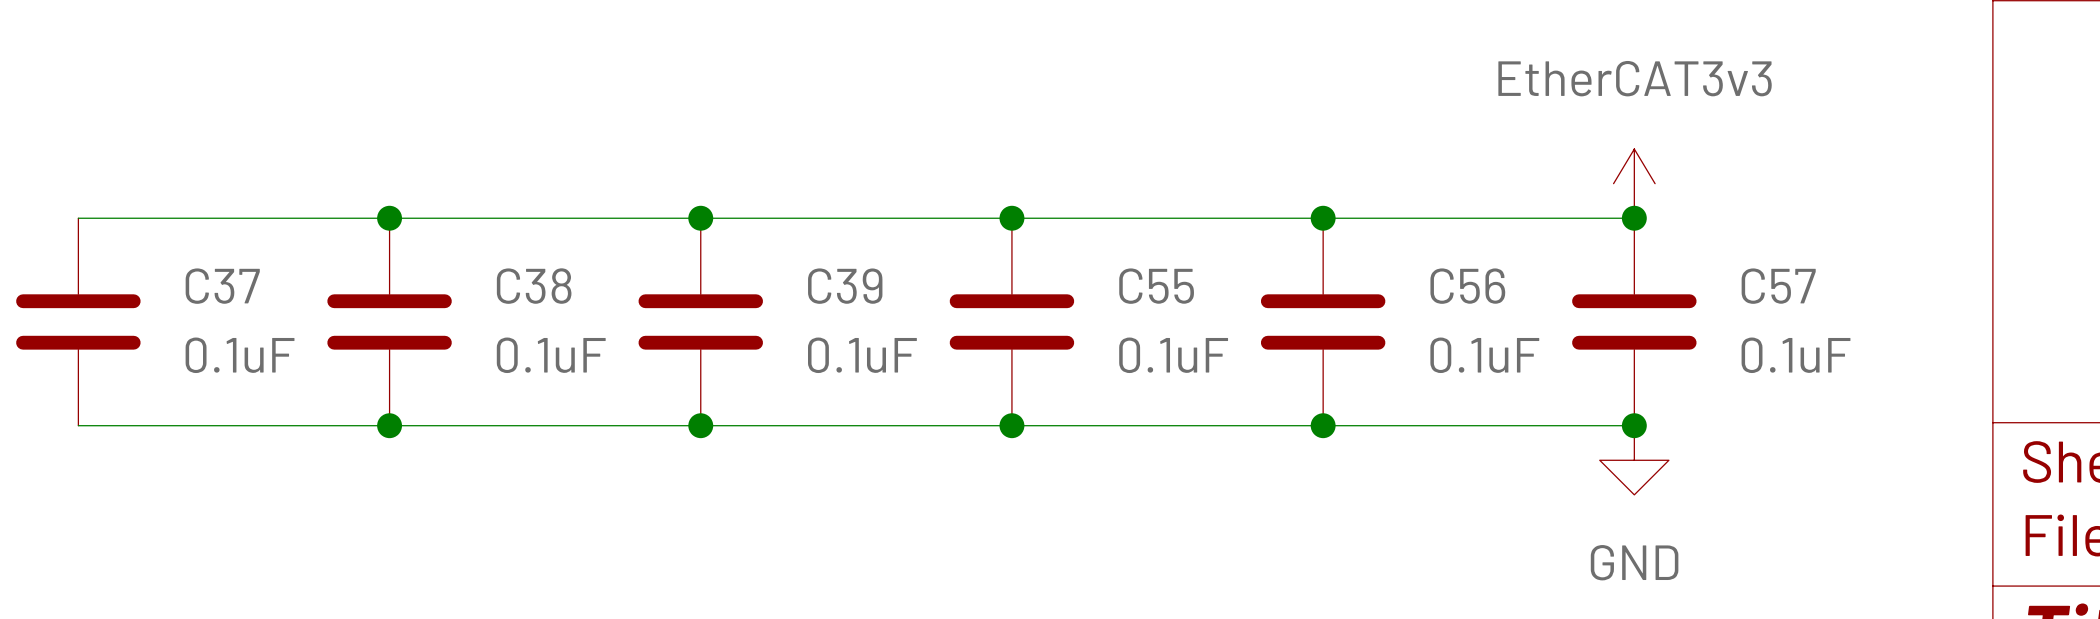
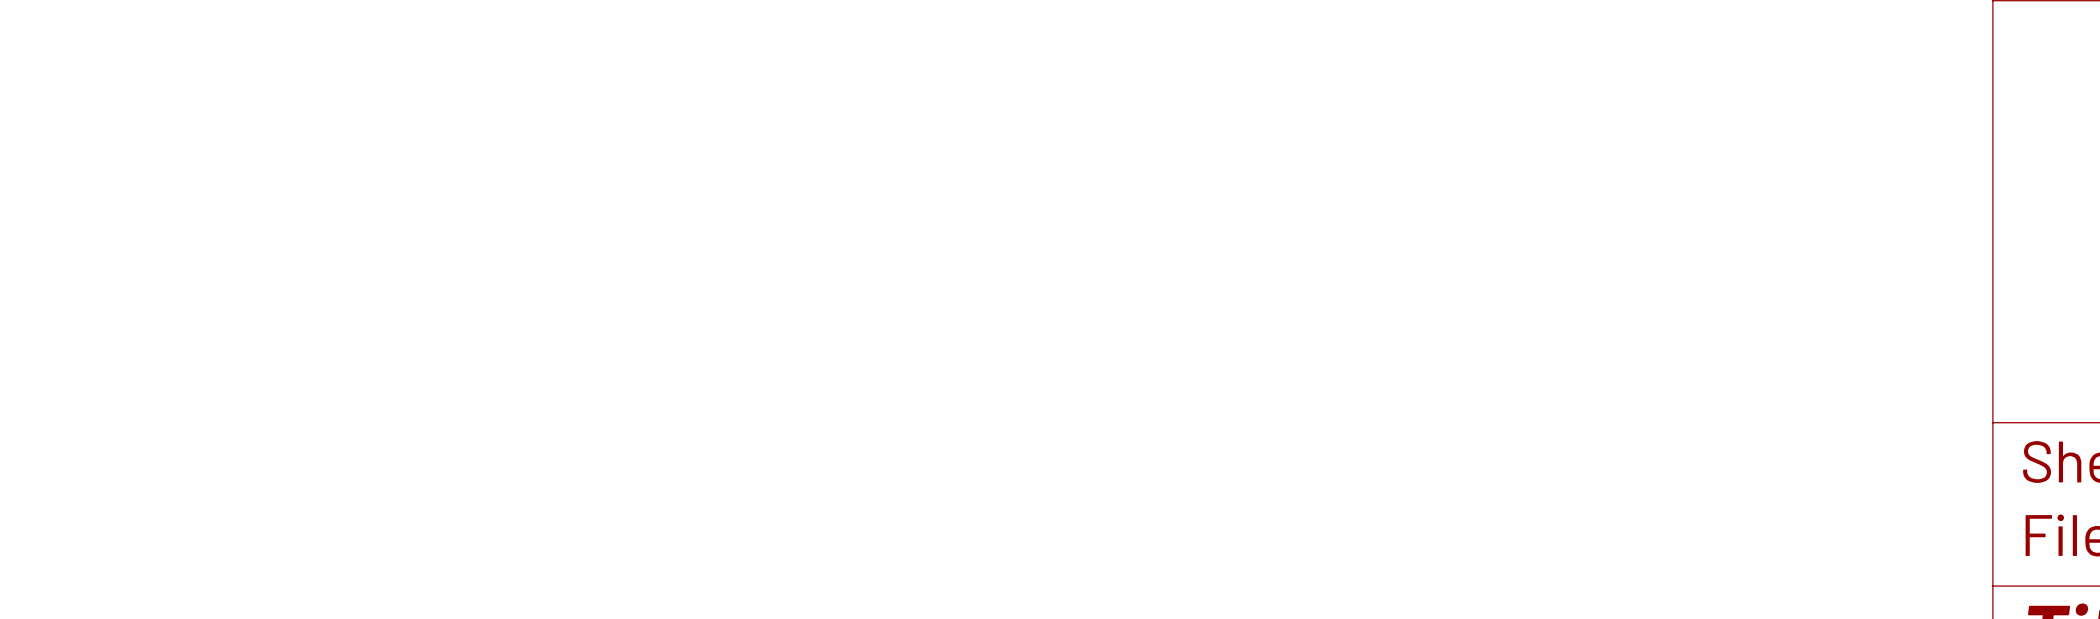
power symbol: EtherCAT3v3 (1634, 183) -> none
wire: (78, 218) (1634, 218) -> none
junction: (389, 218) -> none
junction: (700, 218) -> none
junction: (1011, 218) -> none
junction: (1323, 218) -> none
junction: (1634, 218) -> none
C37: 0.1uF (78, 321) -> none
C38: 0.1uF (389, 321) -> none
C39: 0.1uF (700, 321) -> none
C55: 0.1uF (1011, 321) -> none
C56: 0.1uF (1323, 321) -> none
C57: 0.1uF (1634, 321) -> none
wire: (78, 425) (1634, 425) -> none
junction: (389, 425) -> none
junction: (700, 425) -> none
junction: (1011, 425) -> none
junction: (1323, 425) -> none
junction: (1634, 425) -> none
power symbol: GND (1634, 460) -> none

